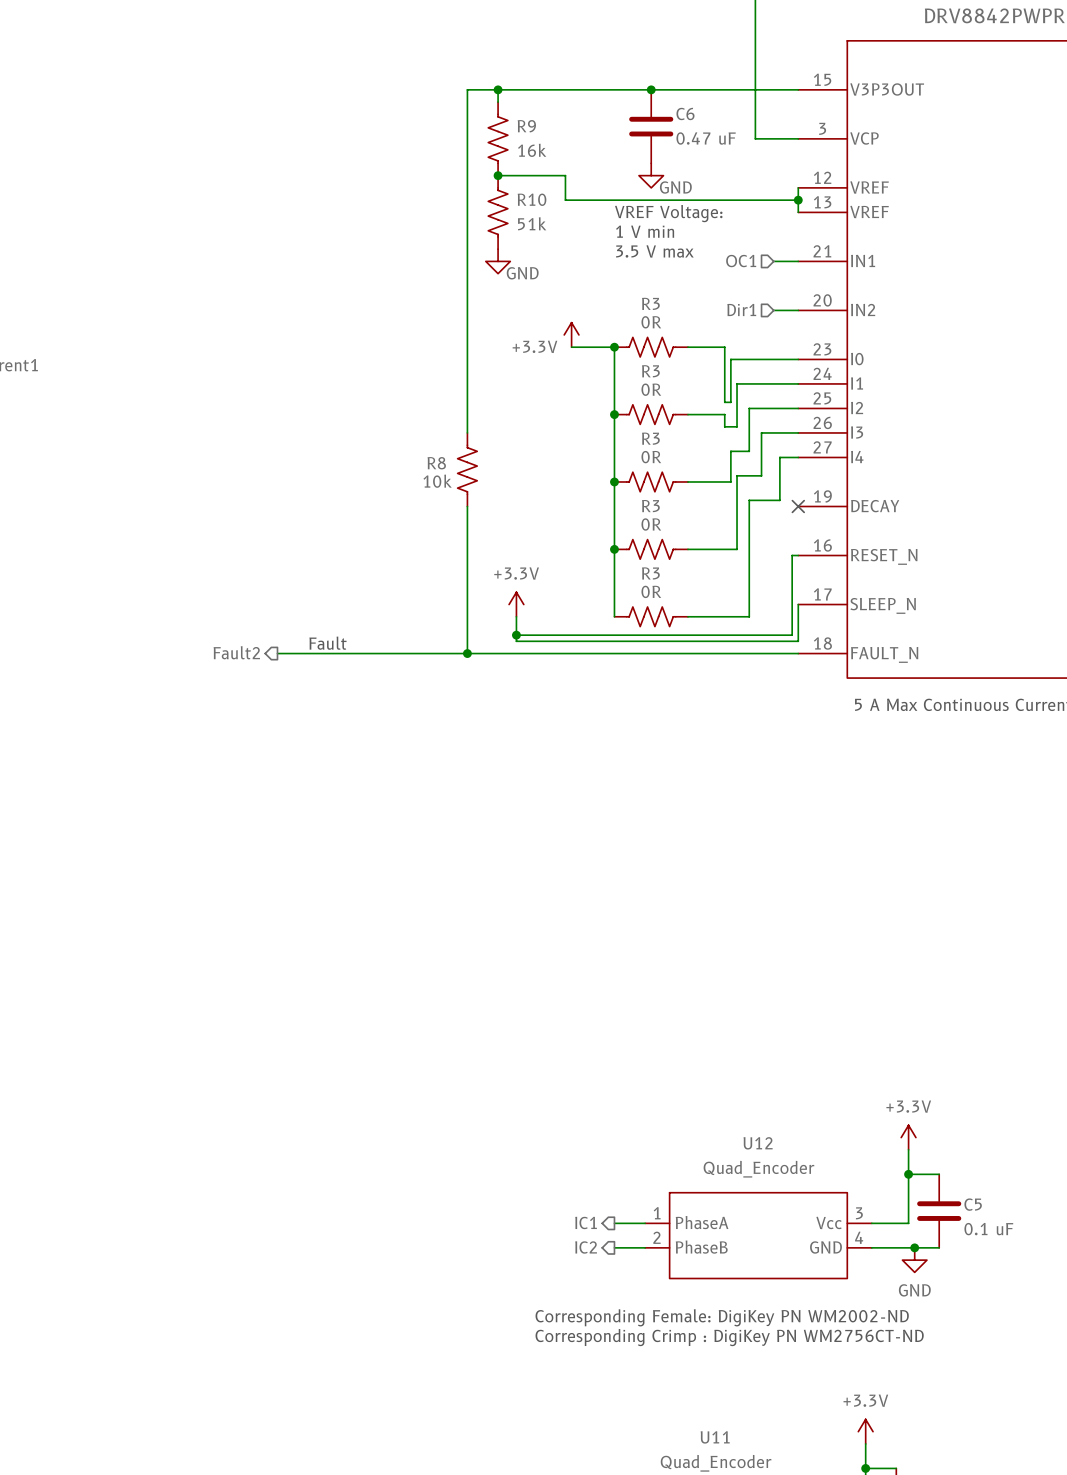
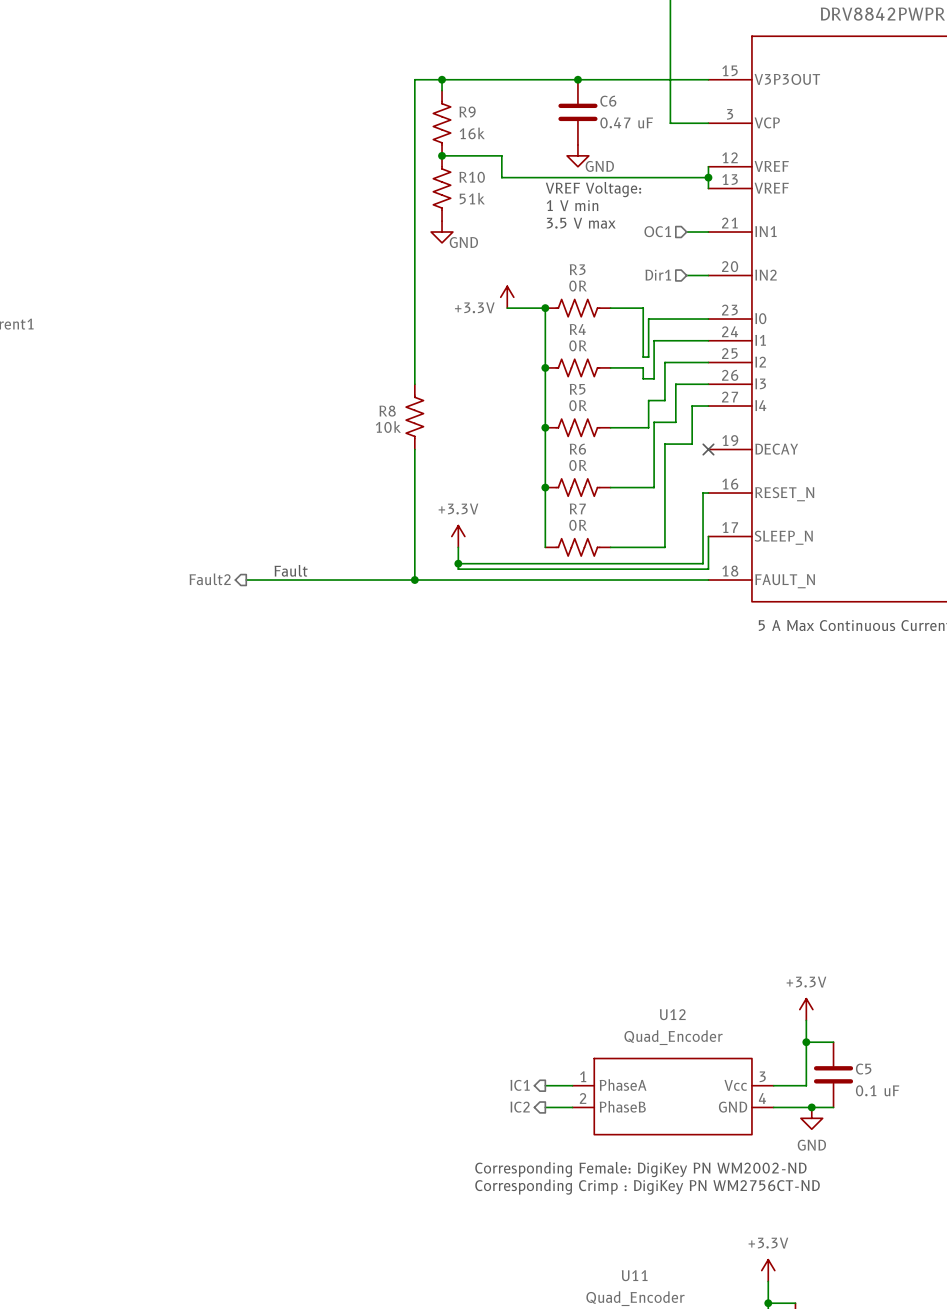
R3 name: R3 (650, 371) -> R4 (577, 329)
R3 name: R3 (650, 438) -> R5 (577, 389)
R3 name: R3 (650, 506) -> R6 (577, 449)
R3 name: R3 (650, 573) -> R7 (577, 508)

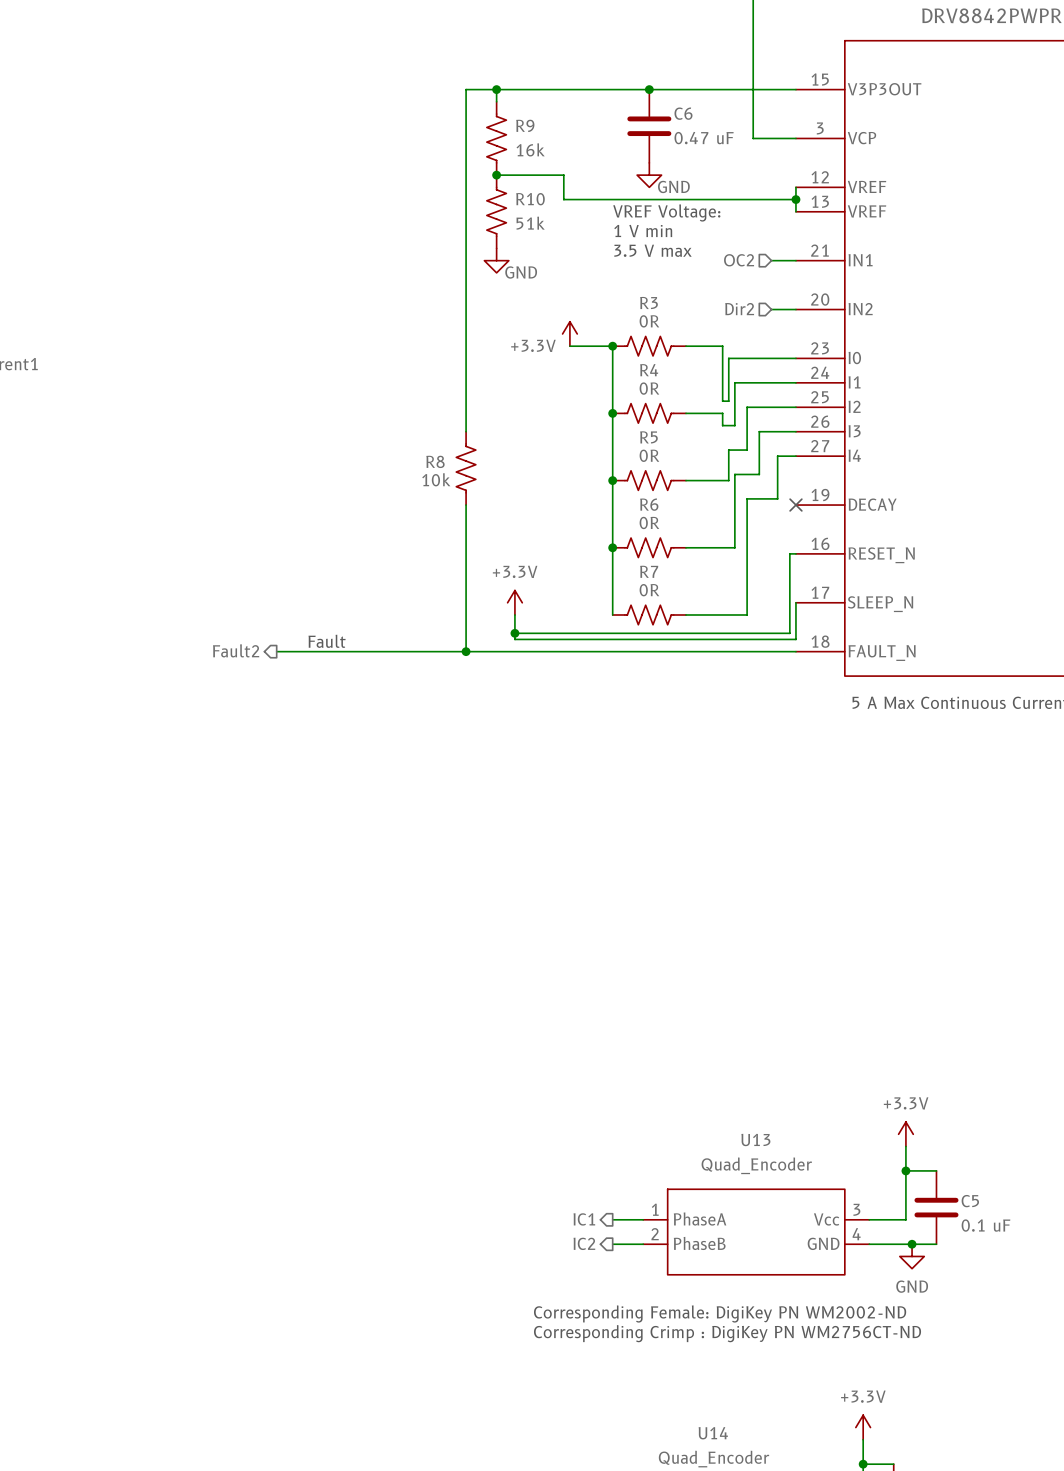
hierarchical label: OC1 (657, 231) -> OC2 (739, 260)
hierarchical label: Dir1 (658, 275) -> Dir2 (739, 309)
U12 name: U12 (672, 1014) -> U13 (755, 1140)
U11 name: U11 (634, 1275) -> U14 (713, 1433)

